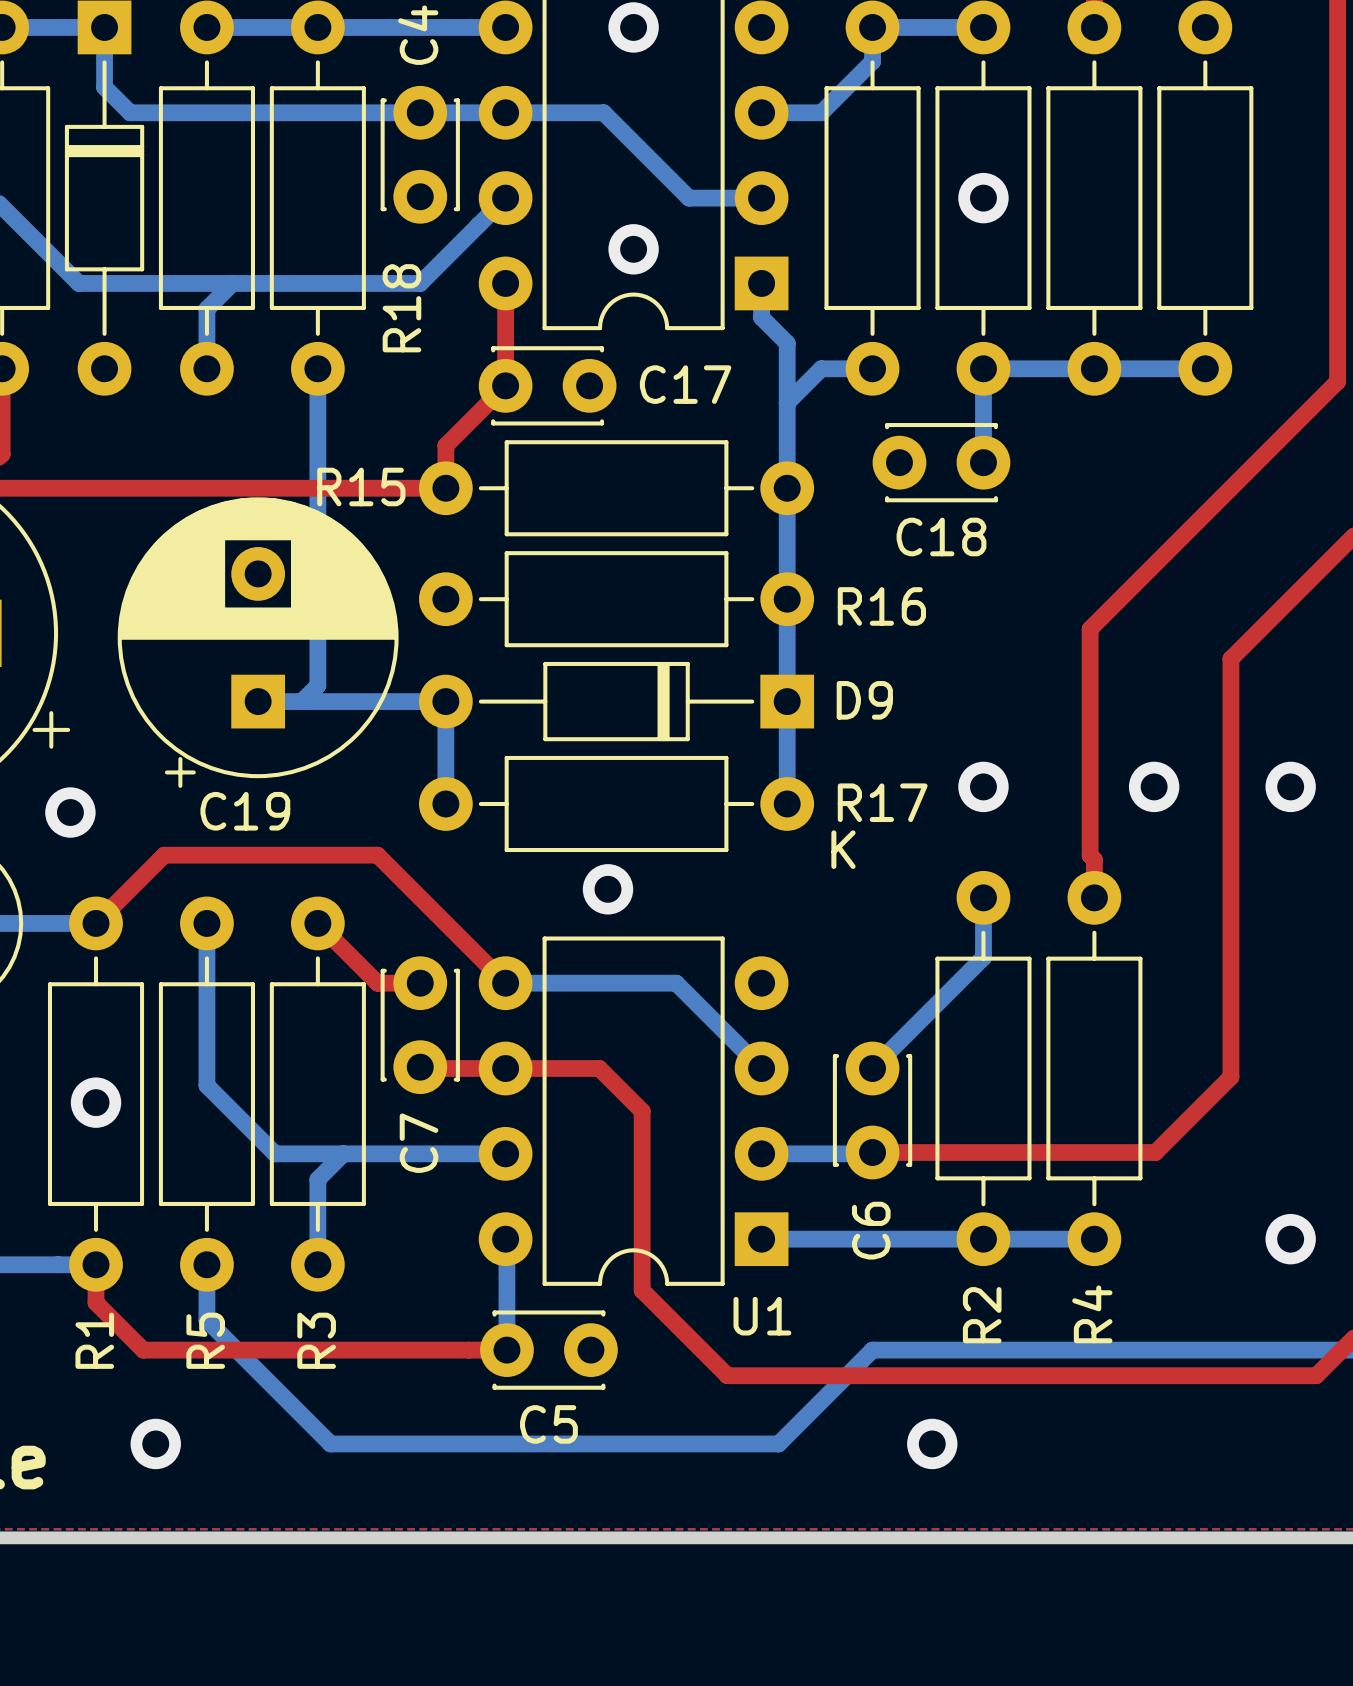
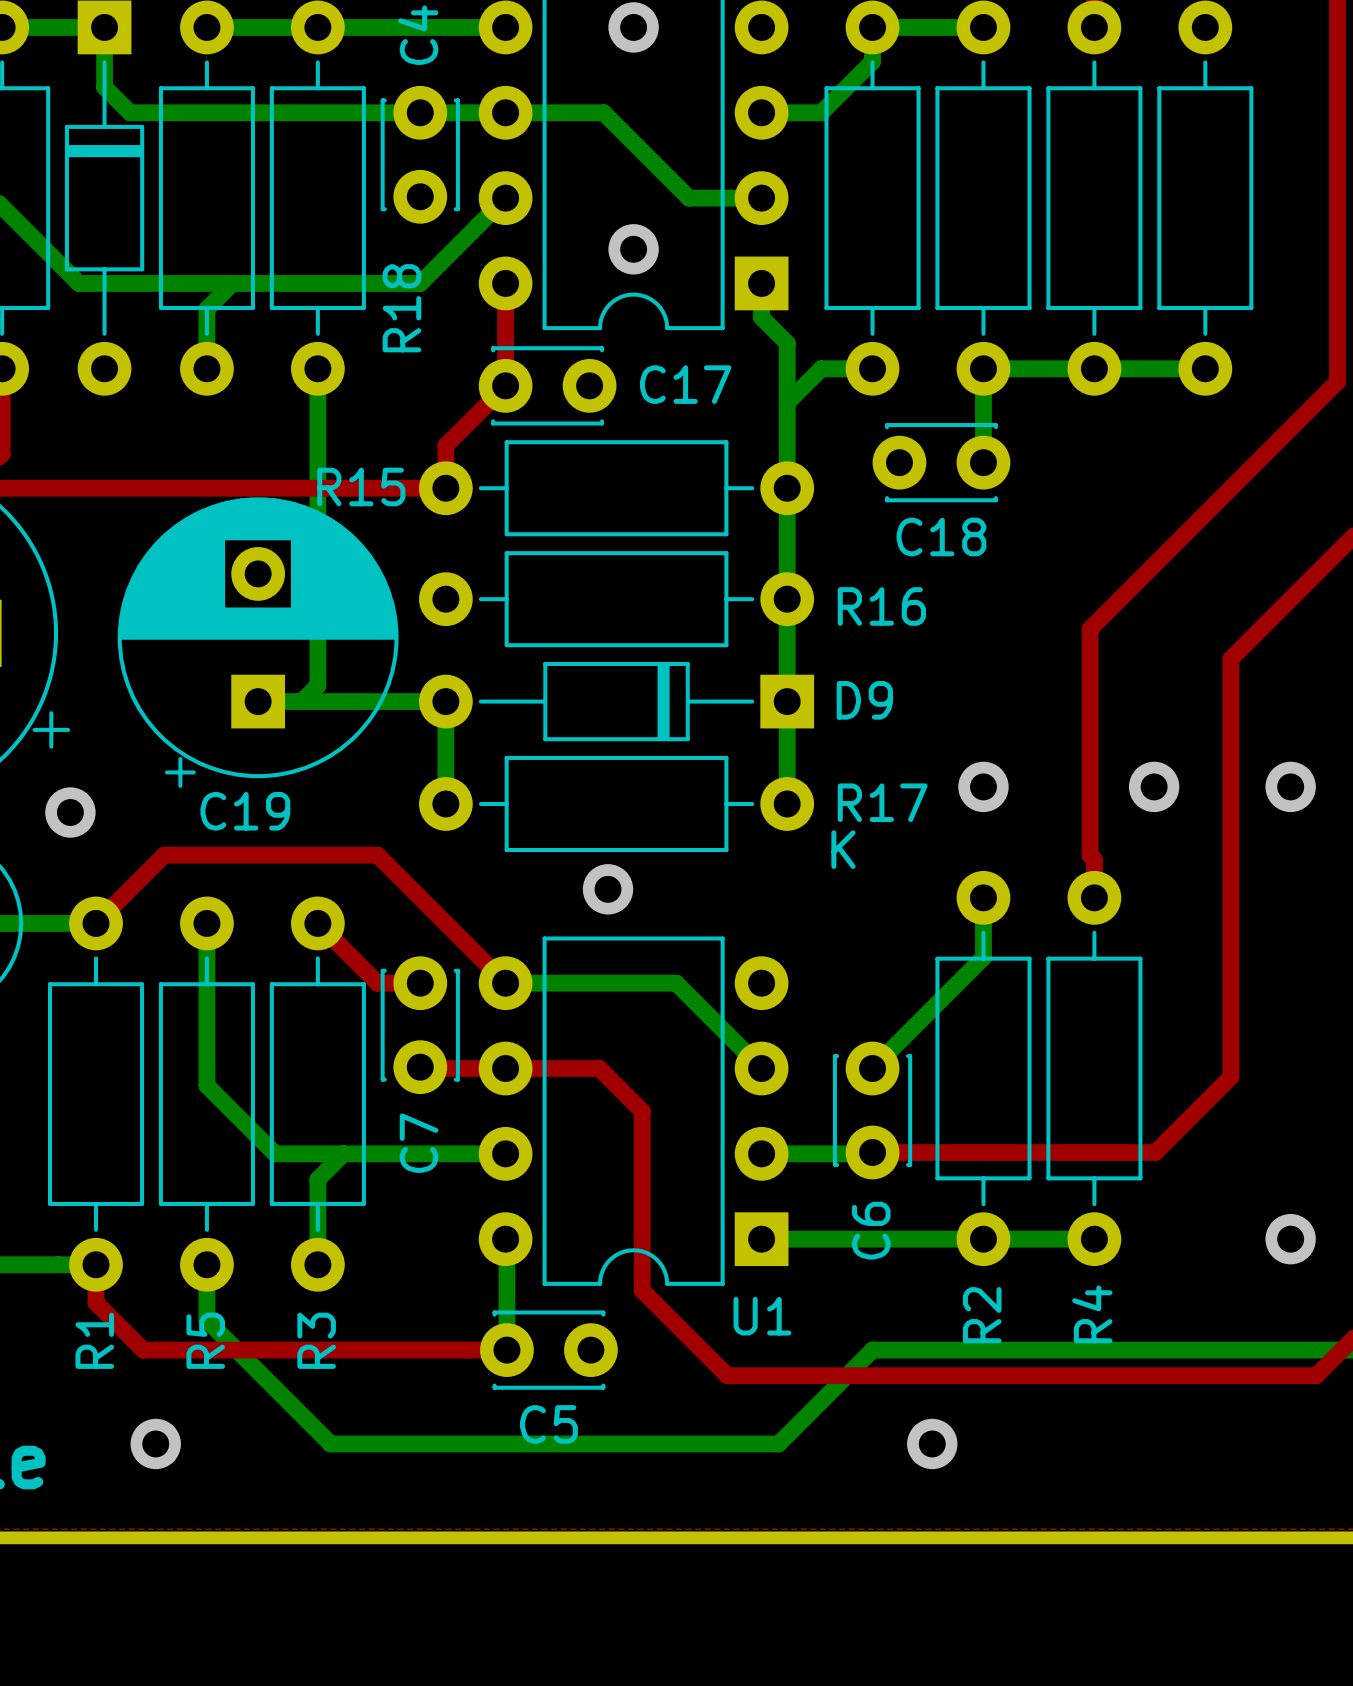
via: (983, 198) -> none
via: (96, 1102) -> none

